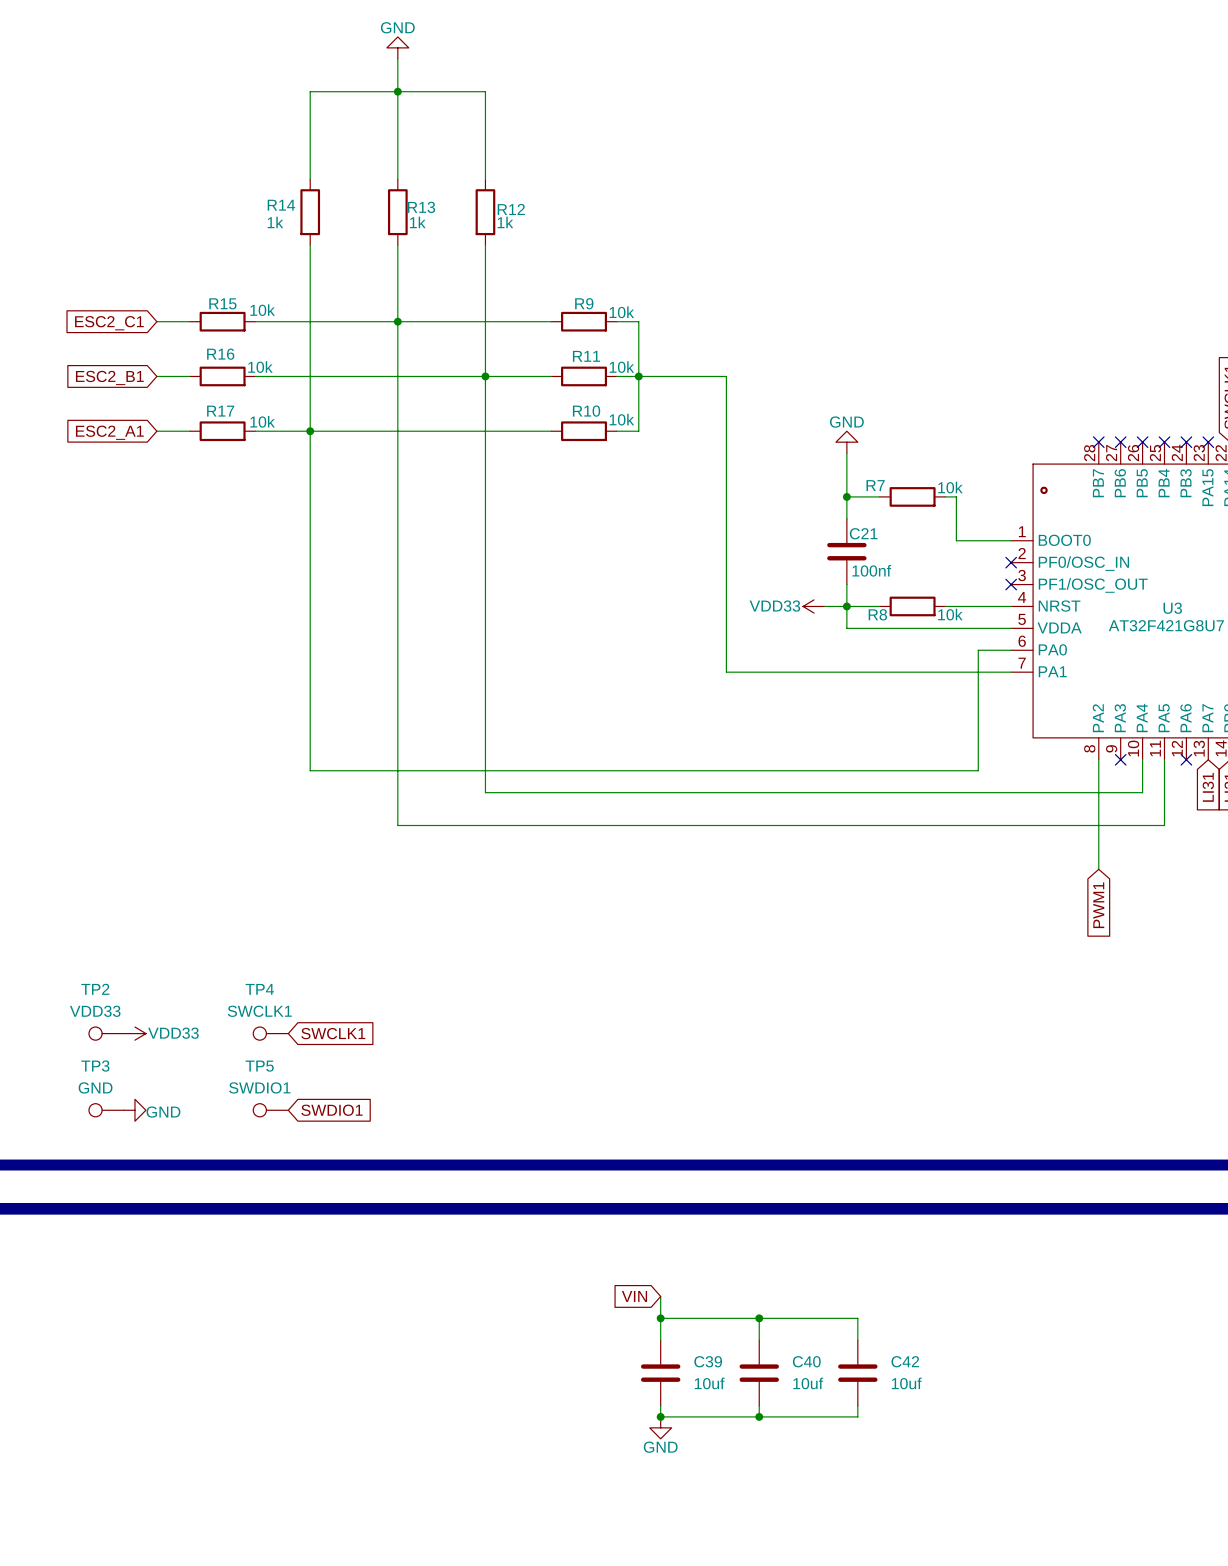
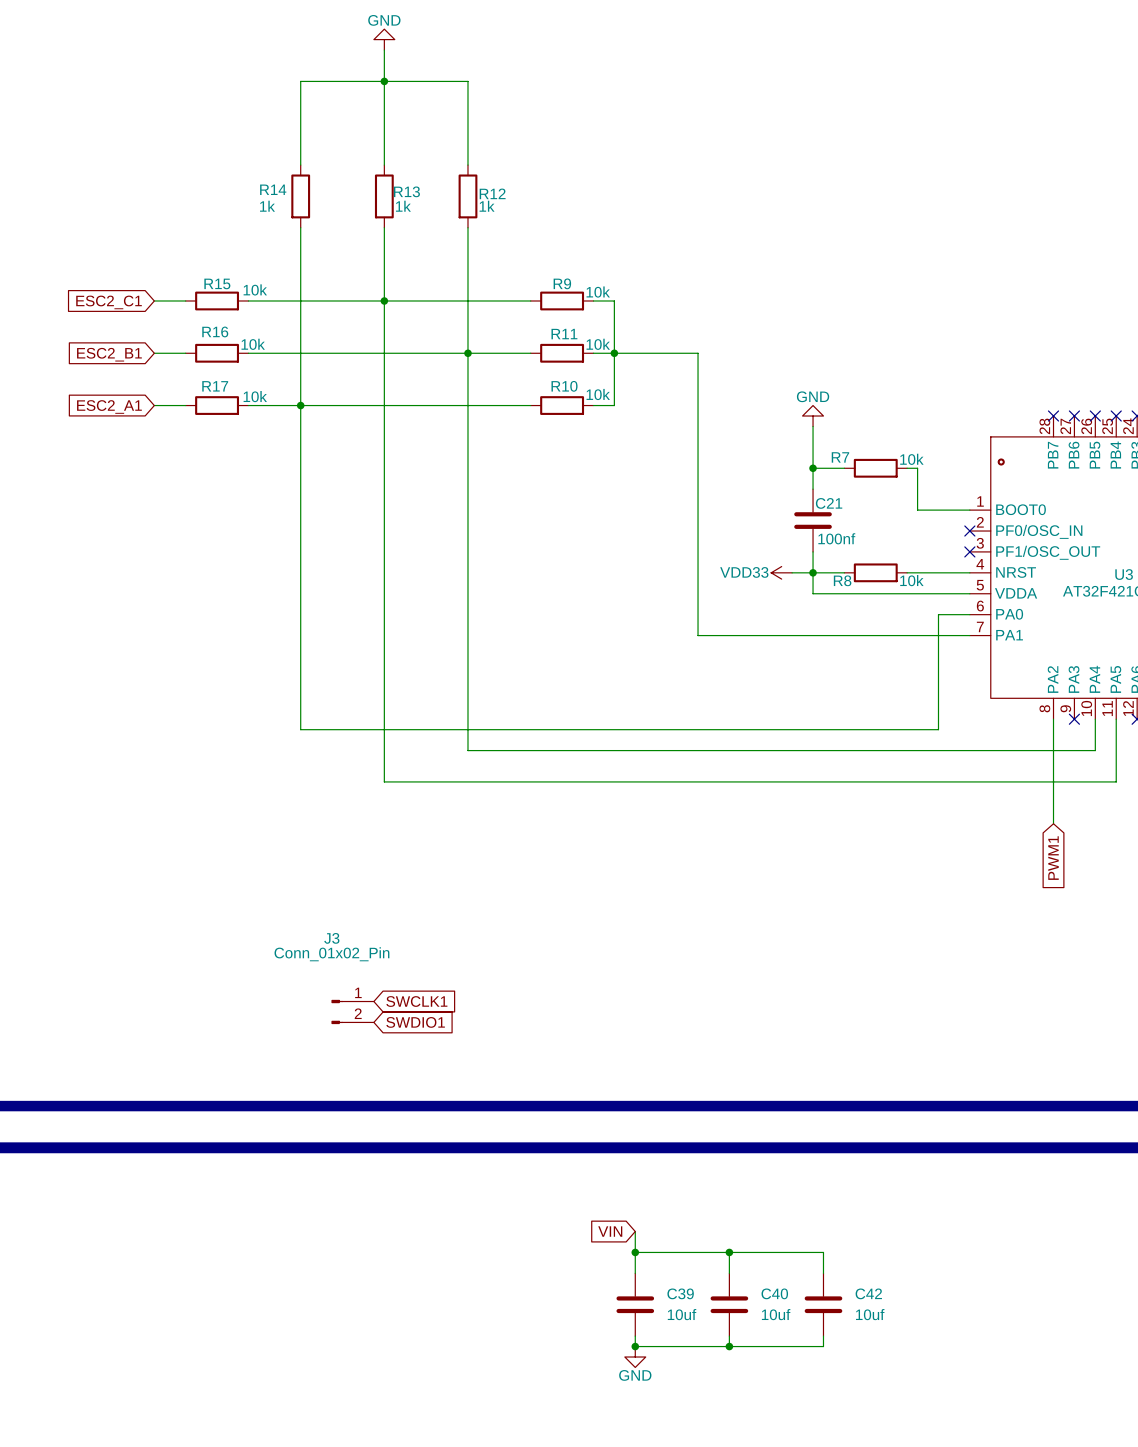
TP2: VDD33 (106, 1033) -> none
power symbol: VDD33 (134, 1033) -> none
TP4: SWCLK1 (270, 1033) -> none
global label position: SWCLK1 (333, 1033) -> SWCLK1 (416, 1001)
J3: none -> Conn_01x02_Pin (352, 1011)
TP3: GND (106, 1110) -> none
power symbol: GND (134, 1110) -> none
TP5: SWDIO1 (270, 1110) -> none
global label position: SWDIO1 (332, 1110) -> SWDIO1 (415, 1022)

